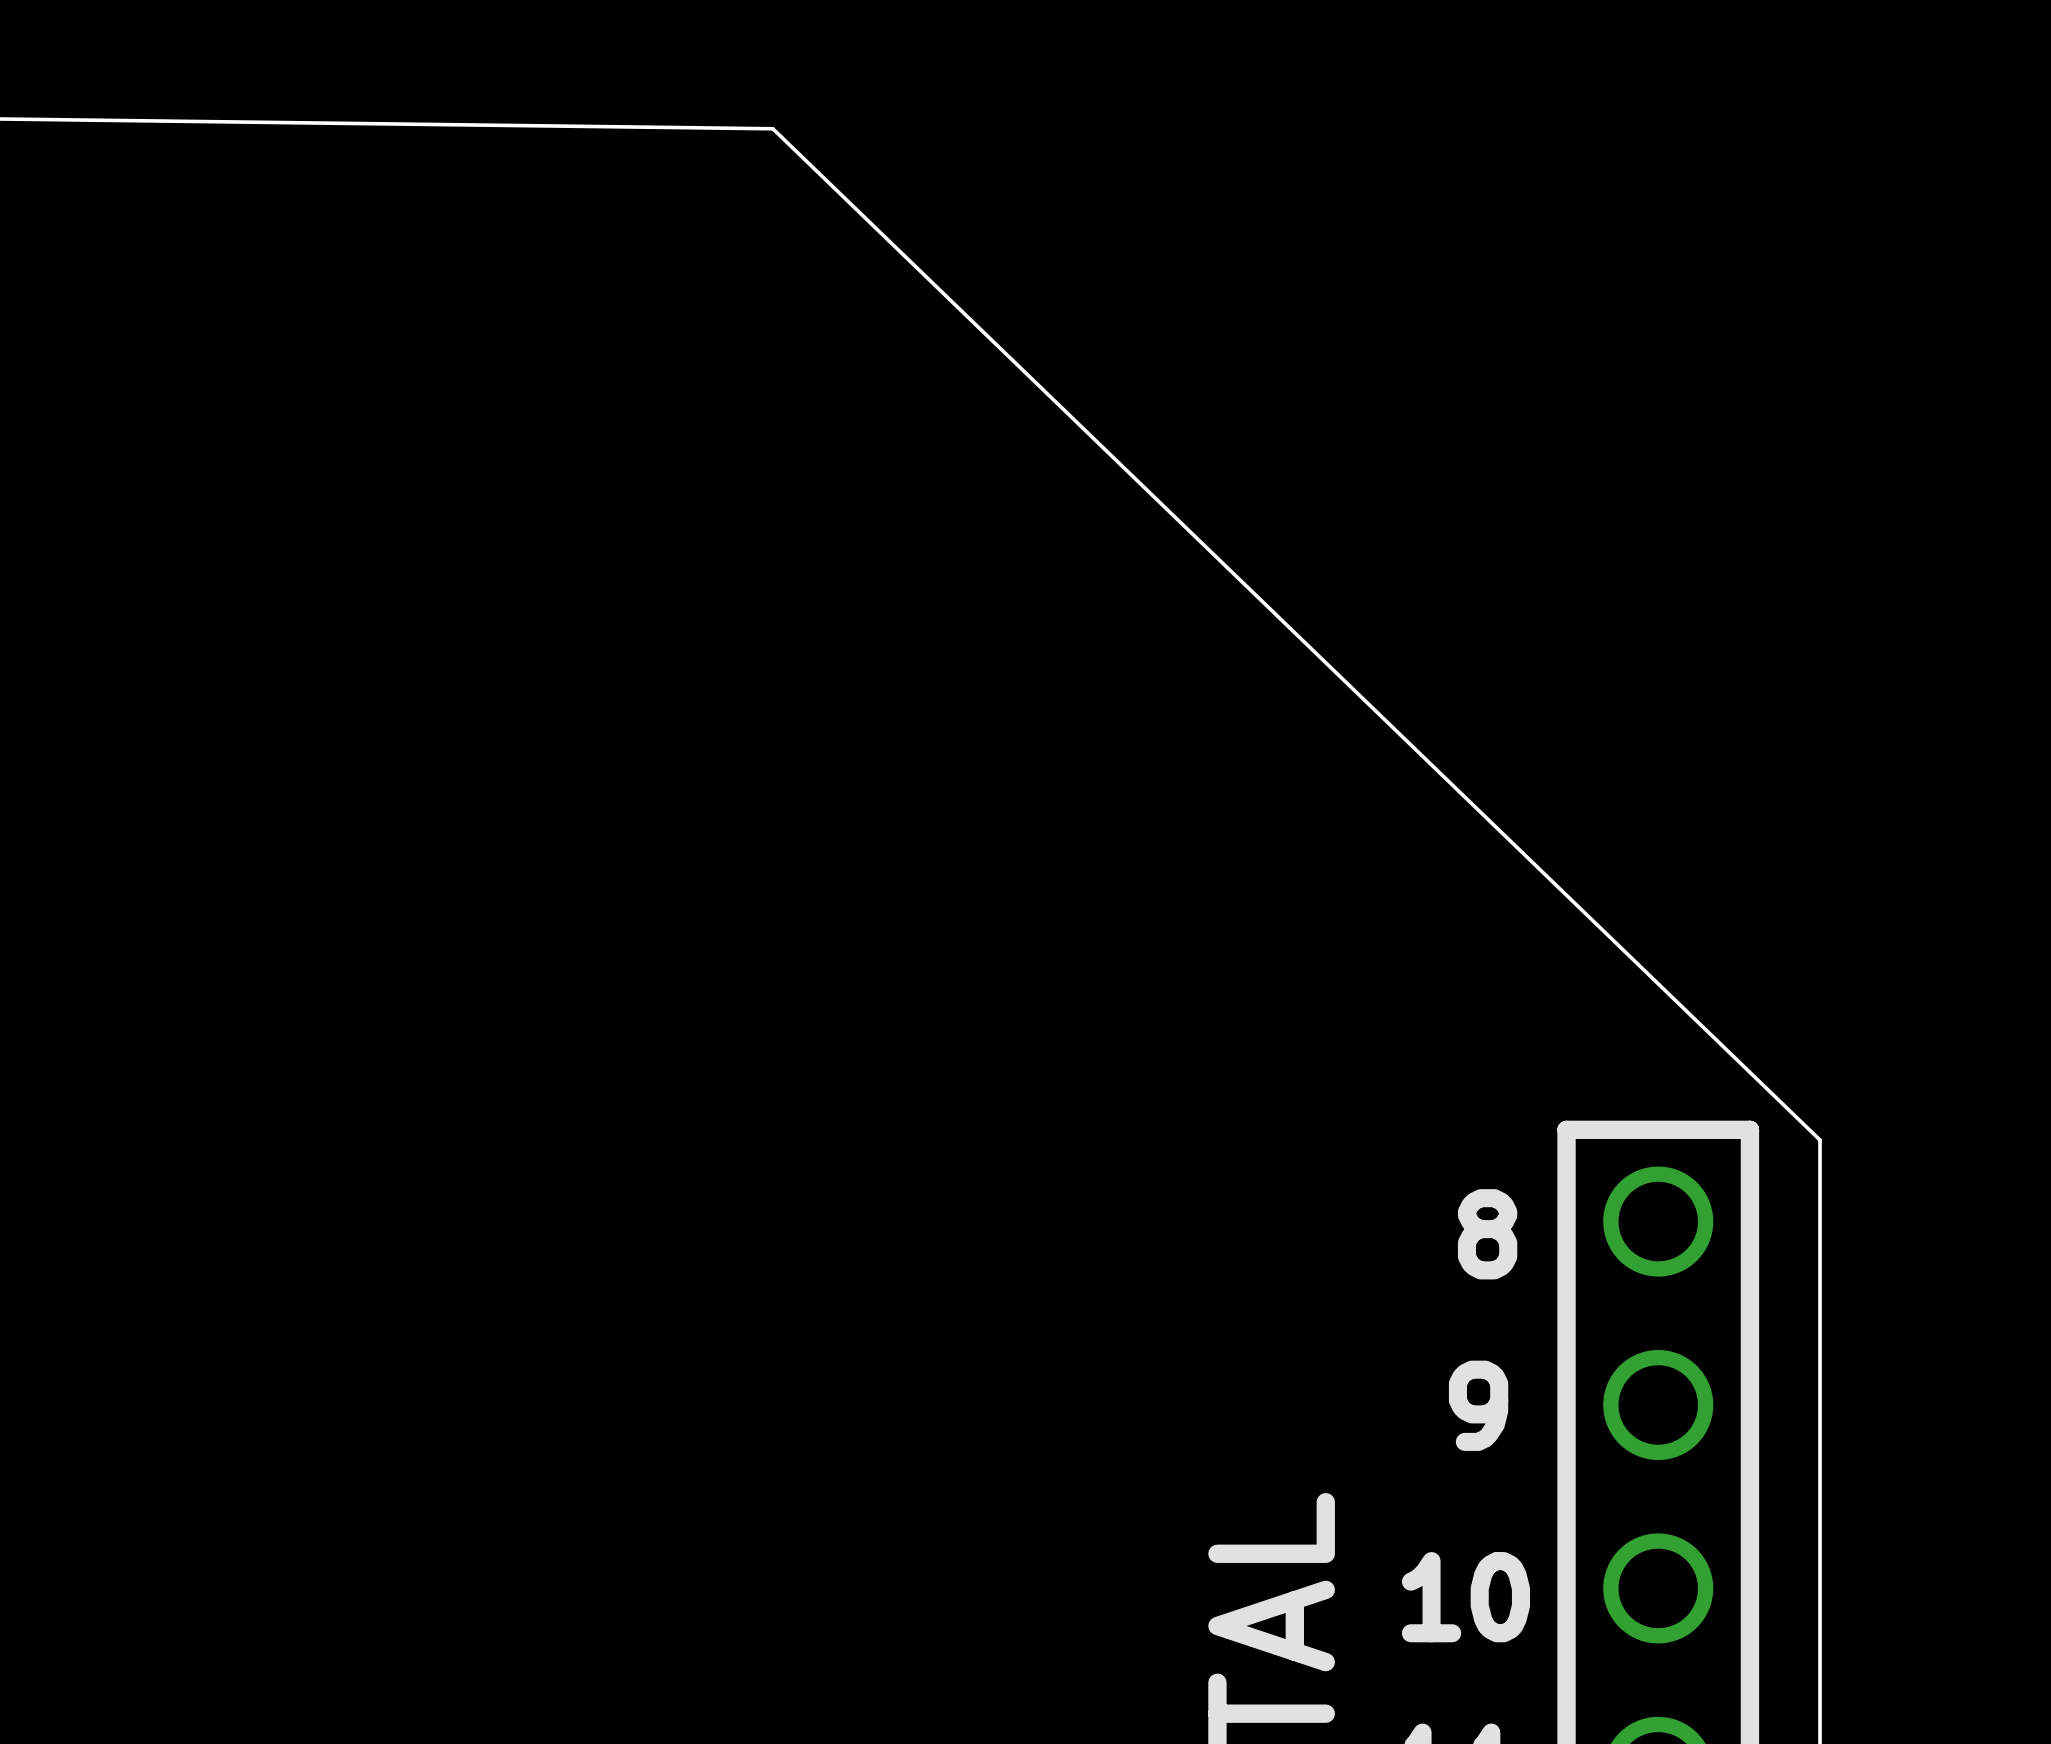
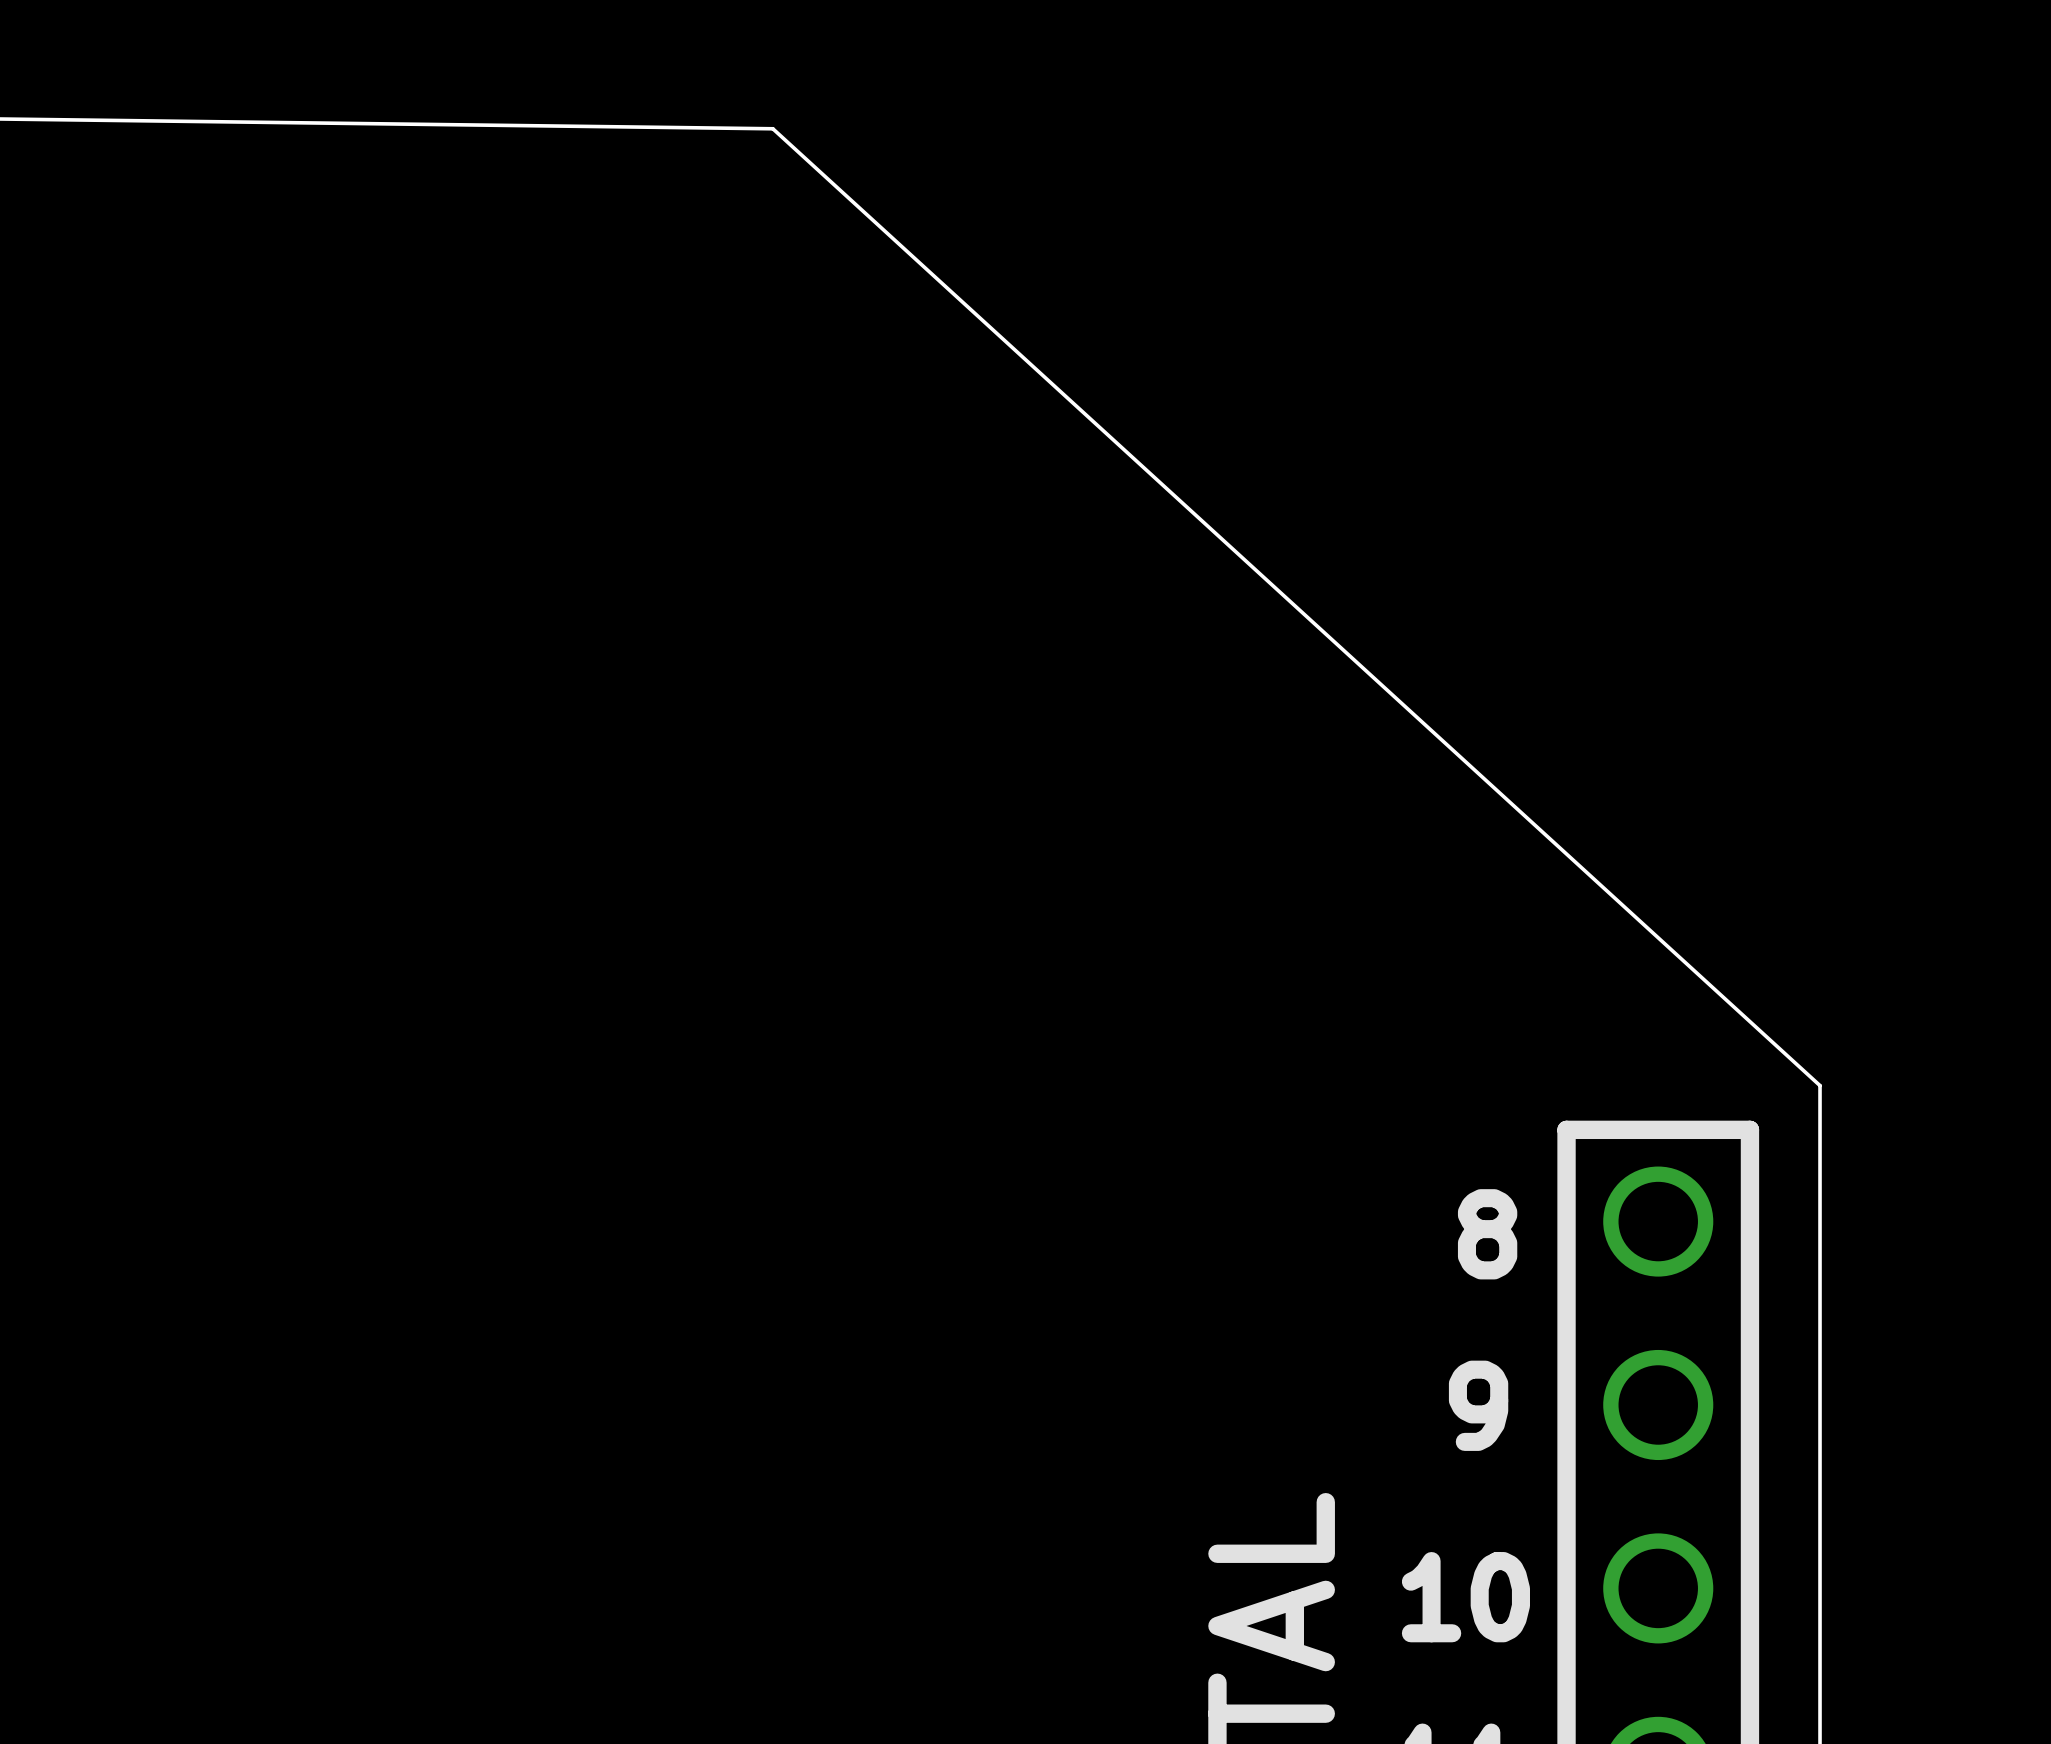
board edge: (772, 128) (1820, 1140) -> (772, 128) (1820, 1085) (1820, 1140)

